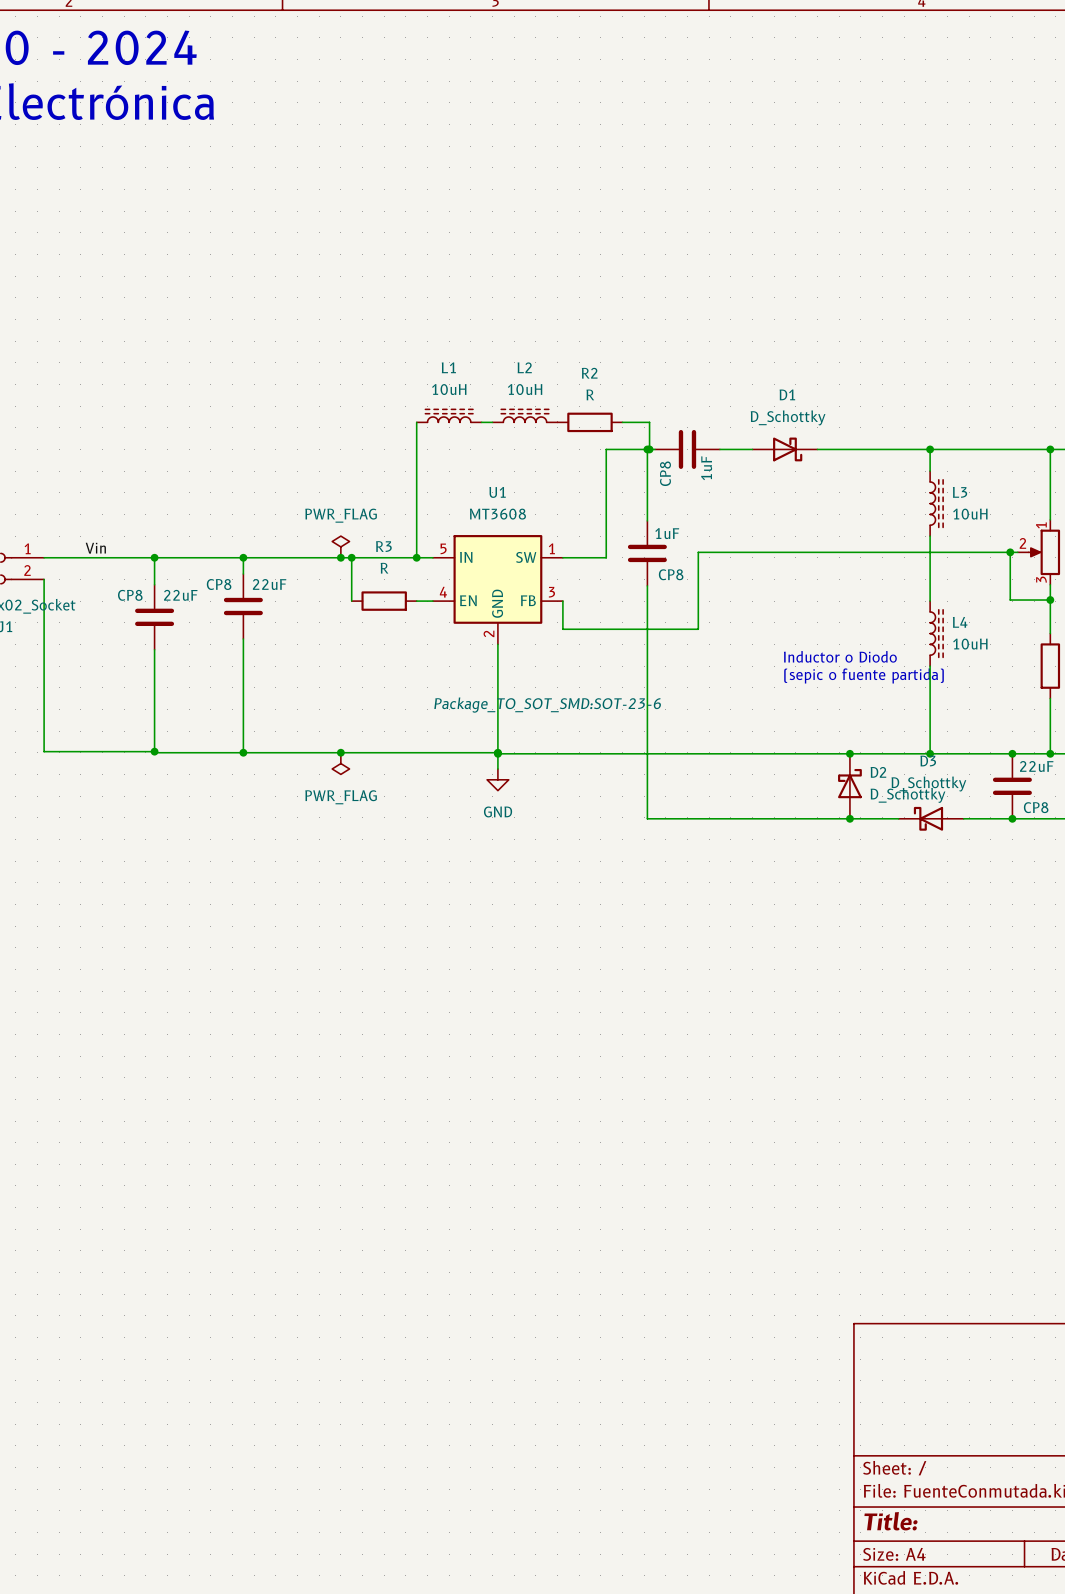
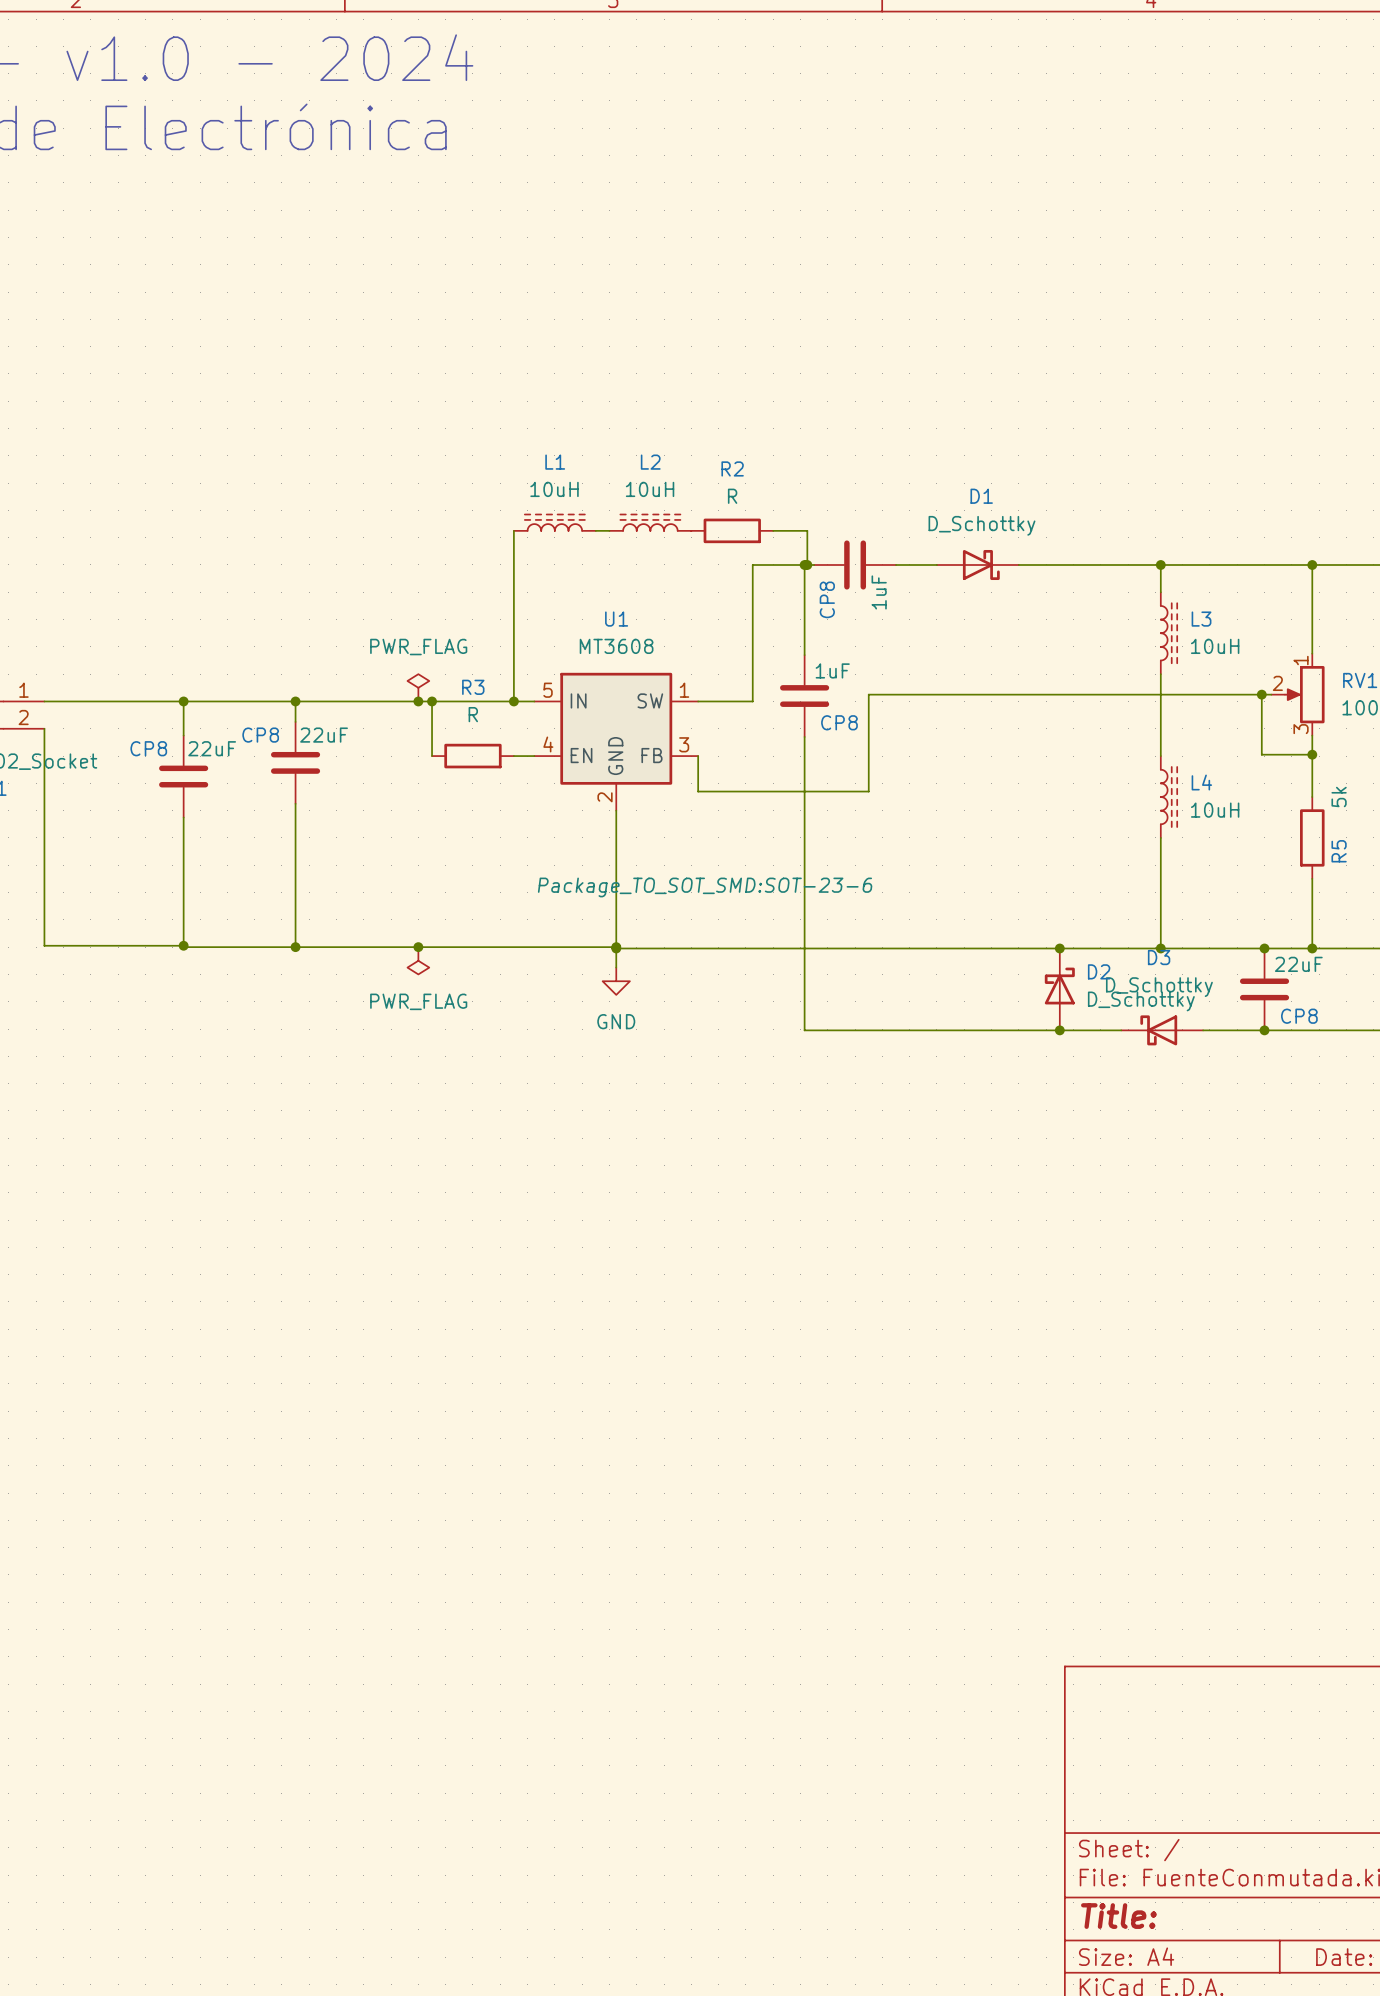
label: Vin (95, 548) -> none
text: Inductor o Diodo (840, 656) -> none
text: (sepic o fuente partida) (864, 675) -> none

